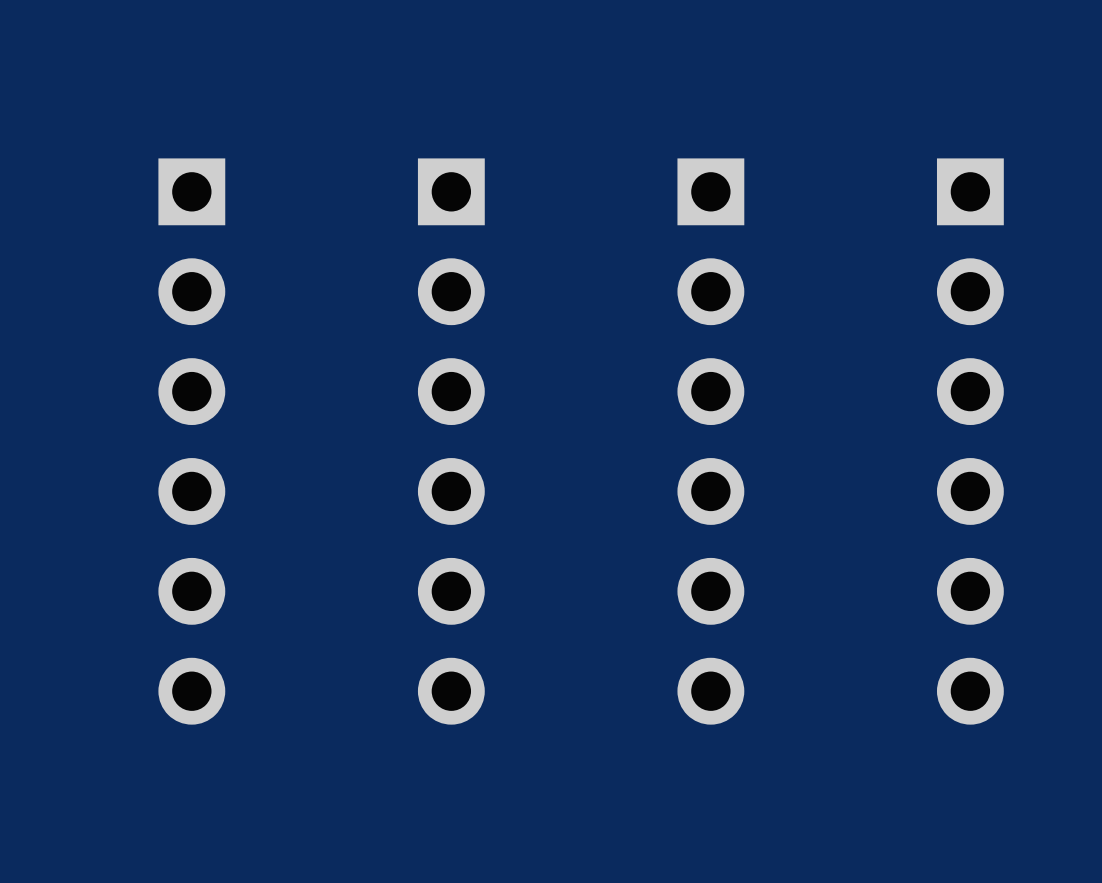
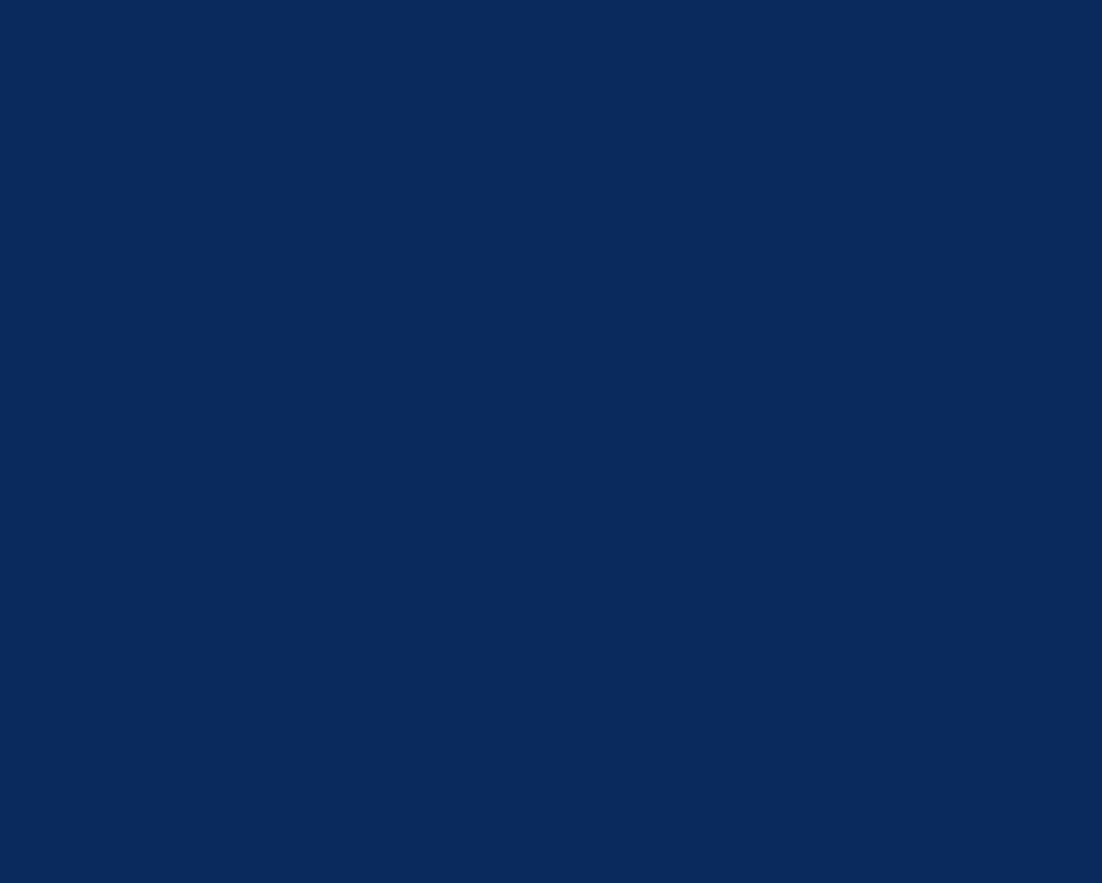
part: (191, 441) -> none
part: (451, 441) -> none
part: (710, 441) -> none
part: (970, 441) -> none

